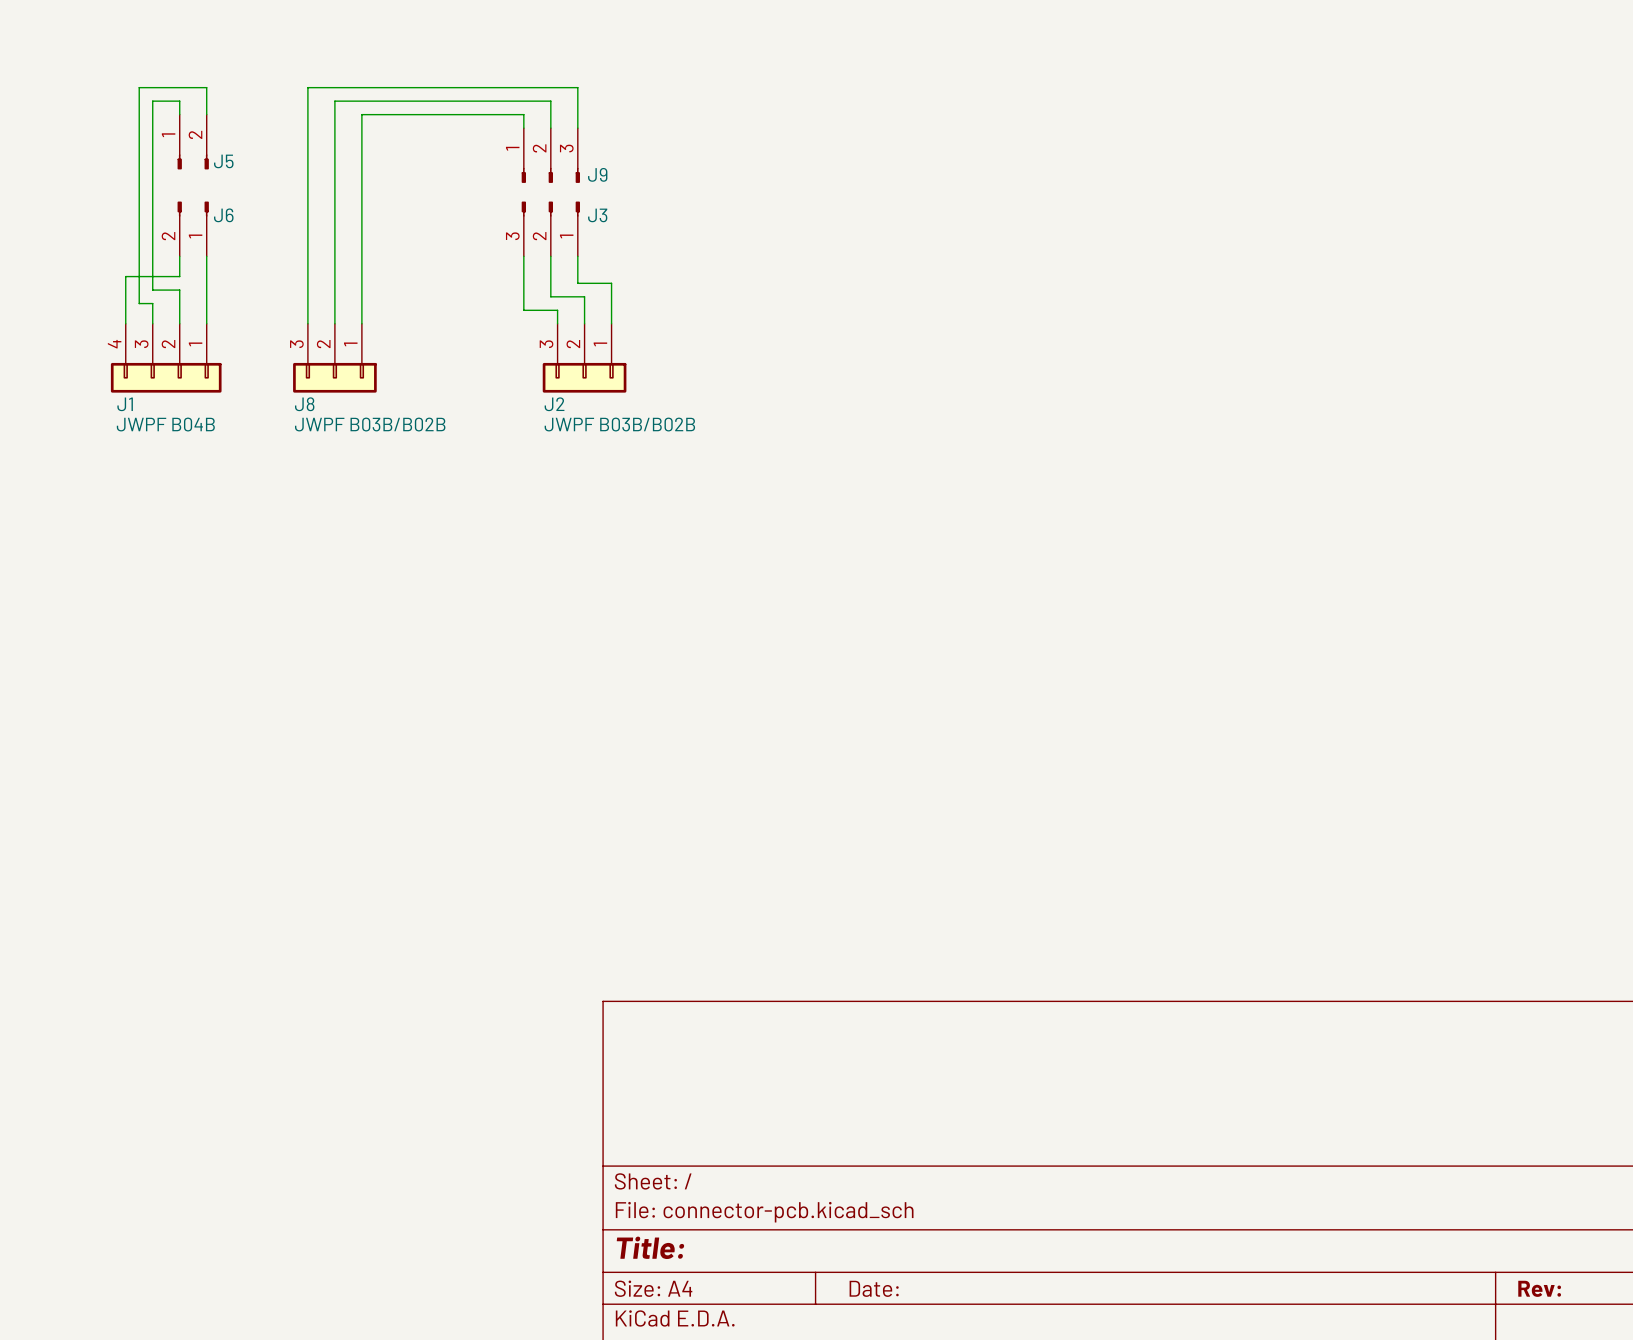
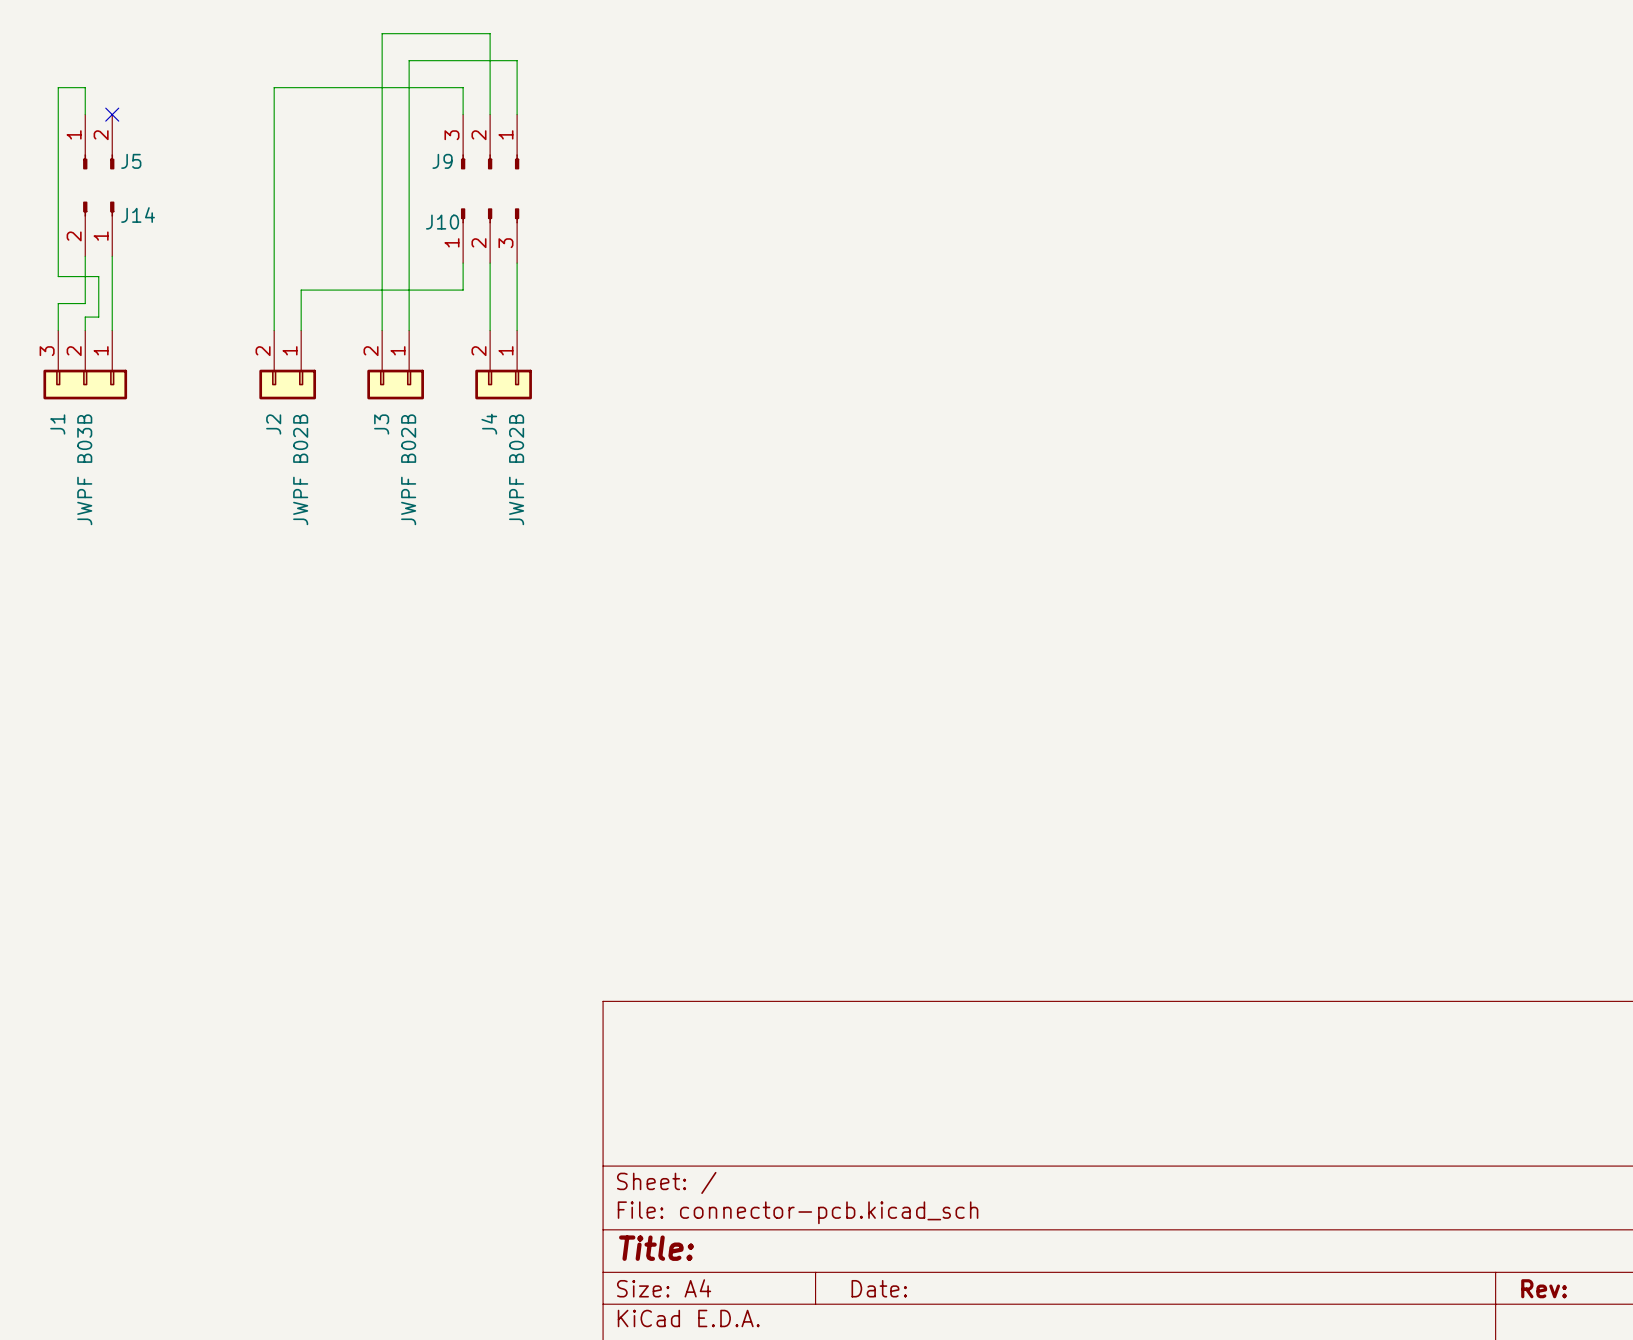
wire: (307, 87) (307, 323) -> (307, 87) (274, 87) (274, 330)
wire: (463, 87) (577, 87) (577, 128) -> (463, 87) (463, 114)
wire: none -> (85, 114) (85, 87) (58, 87) (58, 276) (98, 276) (98, 317) (85, 317) (85, 330)
no-connect mark: none -> (112, 114)
wire: (179, 114) (179, 101) (152, 101) (152, 290) (179, 290) (179, 323) -> none
wire: (206, 114) (206, 87) (139, 87) (139, 303) (152, 303) (152, 323) -> none
wire: none -> (490, 114) (490, 33) (382, 33) (382, 330)
wire: none -> (517, 114) (517, 60) (409, 60) (409, 330)
wire: (523, 128) (523, 114) (361, 114) (361, 323) -> none
wire: (550, 128) (550, 101) (334, 101) (334, 323) -> none
J5 position: (193, 142) -> (98, 142)
J9 position: (550, 155) -> (490, 142)
J9 flip: as is (550, 175) -> left-right (490, 161)
J3 symbol: [521, 201, 580, 257] -> [367, 330, 424, 400]
J3 name position: J3 (597, 215) -> J3 (381, 424)
J14: none -> (98, 228)
J6: (193, 228) -> none
J10: none -> (490, 235)
wire: none -> (85, 256) (85, 303) (58, 303) (58, 330)
wire: none -> (112, 256) (112, 330)
wire: (179, 256) (179, 276) (125, 276) (125, 323) -> none
wire: (206, 256) (206, 323) -> none
wire: (523, 256) (523, 310) (557, 310) (557, 323) -> none
wire: (550, 256) (550, 296) (584, 296) (584, 323) -> none
wire: (577, 256) (577, 283) (611, 283) (611, 323) -> none
wire: none -> (463, 263) (463, 290) (301, 290) (301, 330)
wire: none -> (490, 263) (490, 330)
wire: none -> (517, 263) (517, 330)
J1 symbol: [110, 323, 222, 393] -> [43, 330, 128, 400]
J2 symbol: [542, 323, 627, 393] -> [259, 330, 317, 400]
J8: JWPF B03B/B02B (334, 358) -> none
J4: none -> JWPF B02B (503, 364)
J1 value: JWPF B04B (165, 424) -> JWPF B03B (84, 469)
J2 value: JWPF B03B/B02B (619, 424) -> JWPF B02B (300, 469)
J3 value: none -> JWPF B02B (408, 469)

